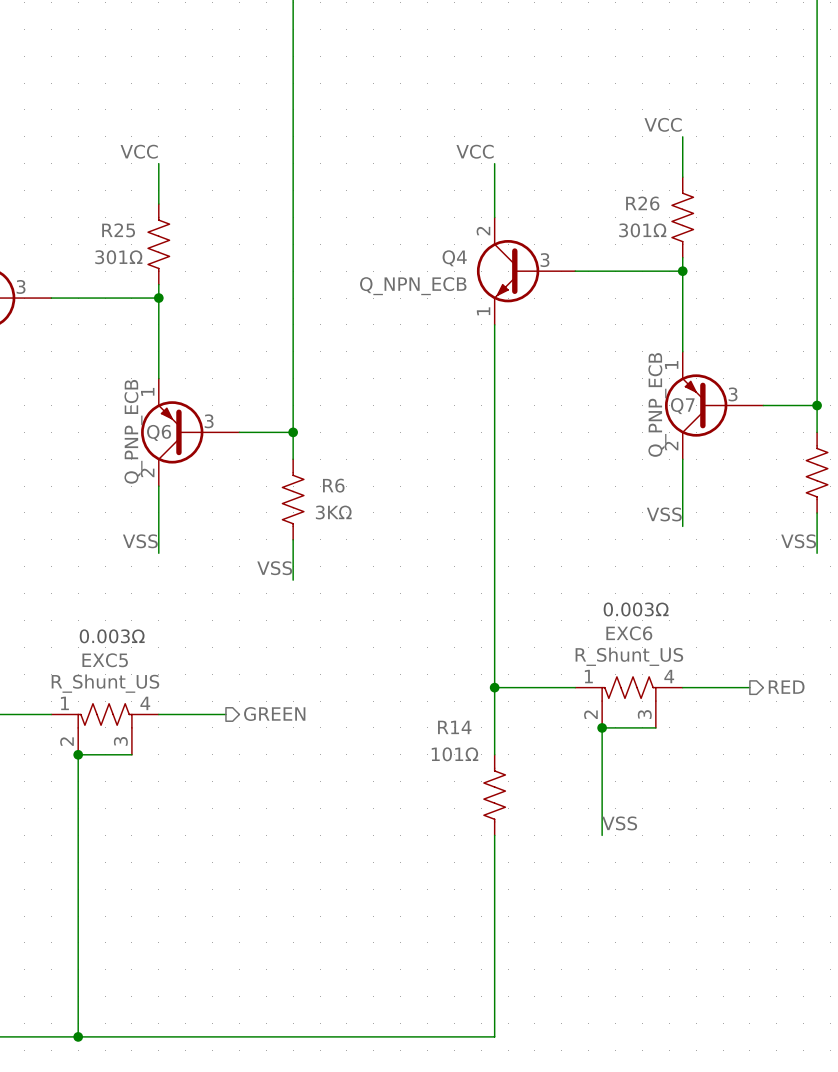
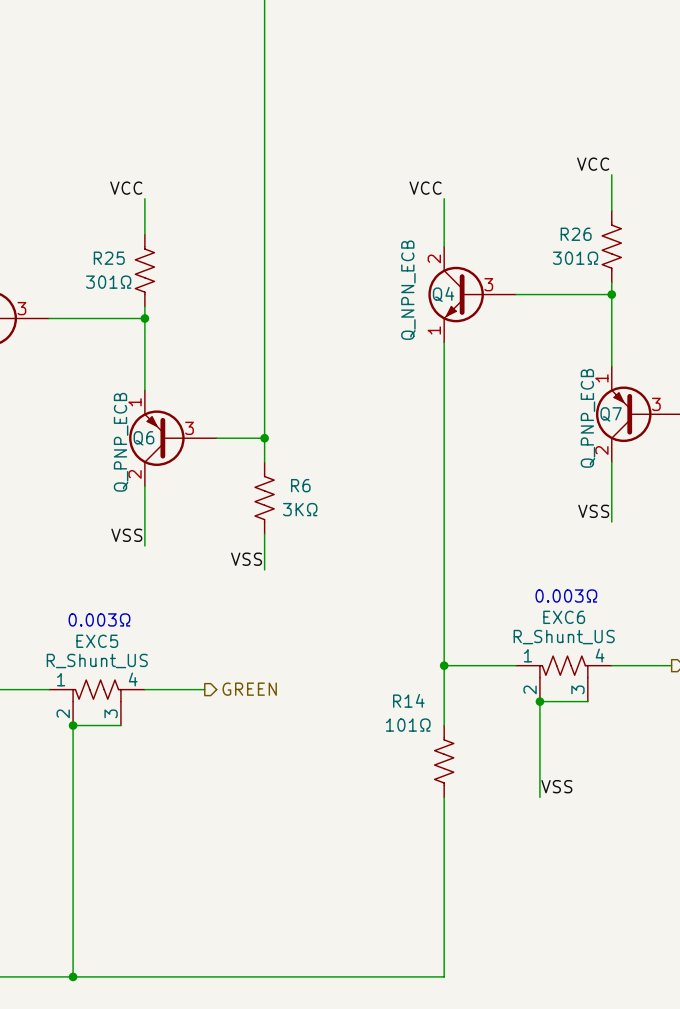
Q4 name position: Q4 (454, 258) -> Q4 (443, 294)
Q4 value rotation: 0° (413, 286) -> 90° counterclockwise (408, 290)

